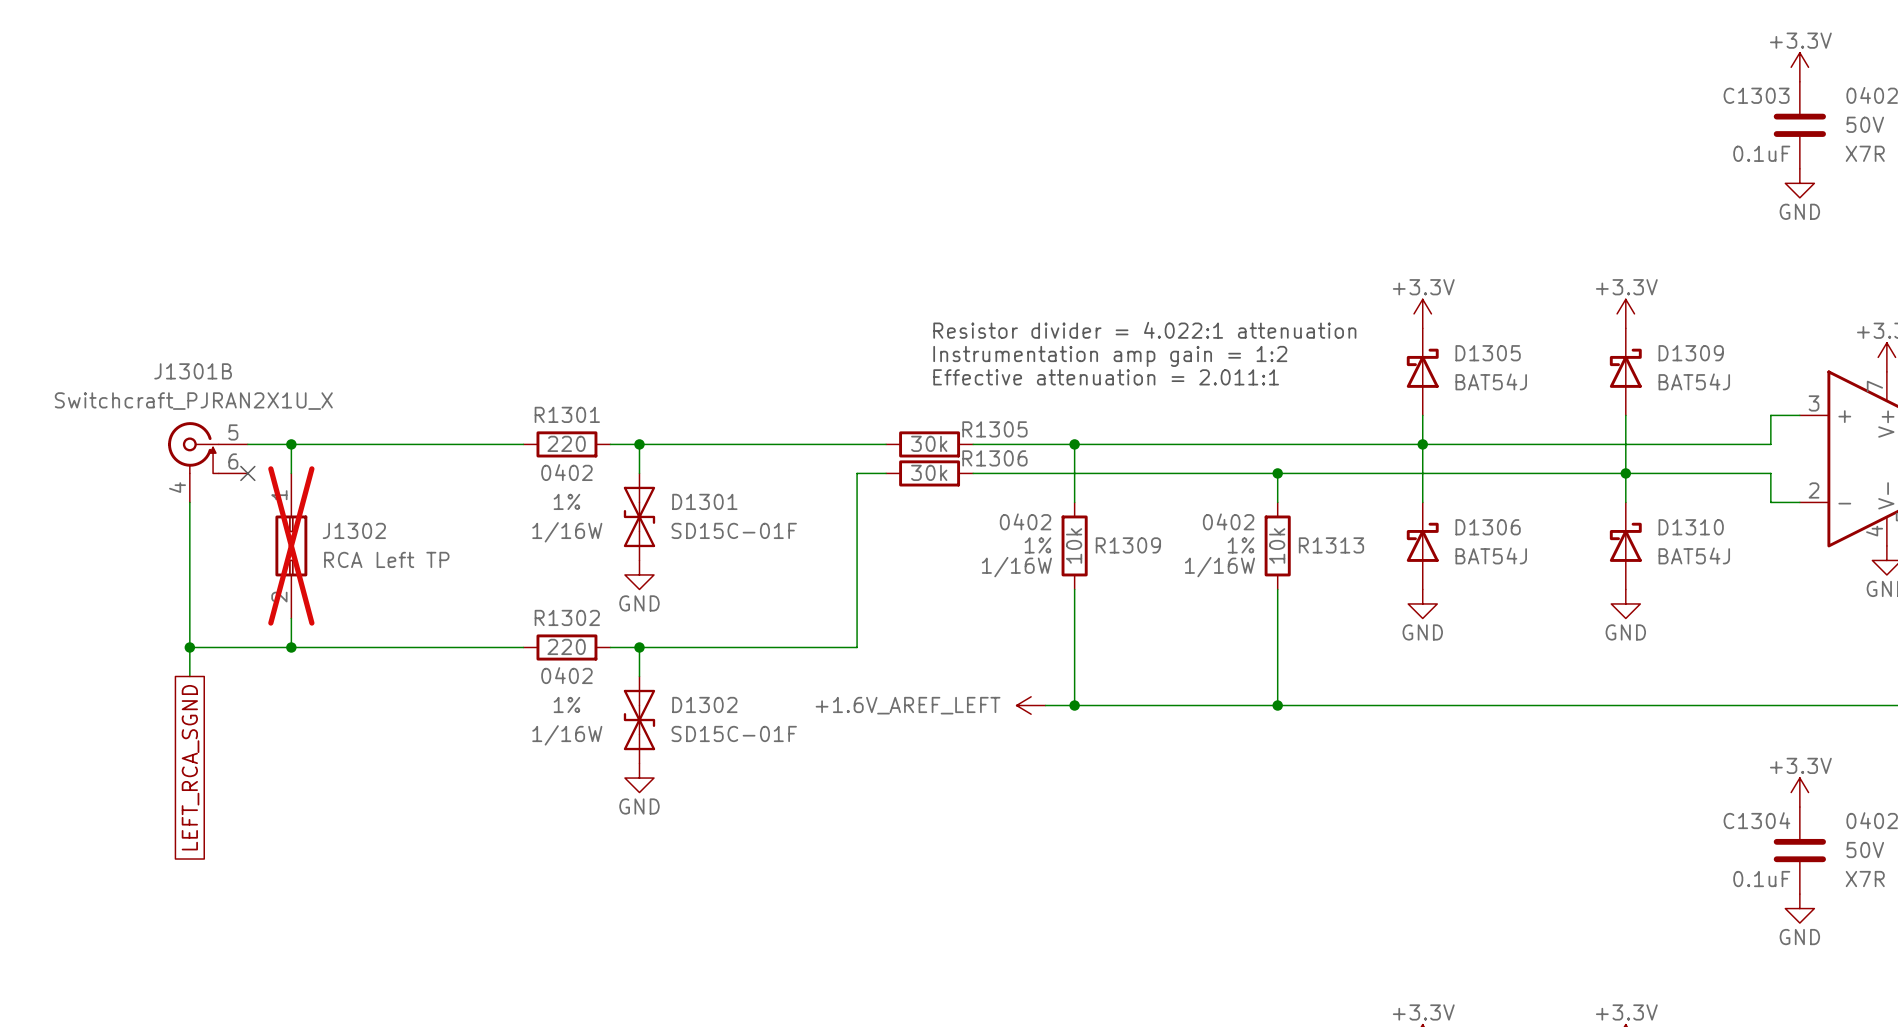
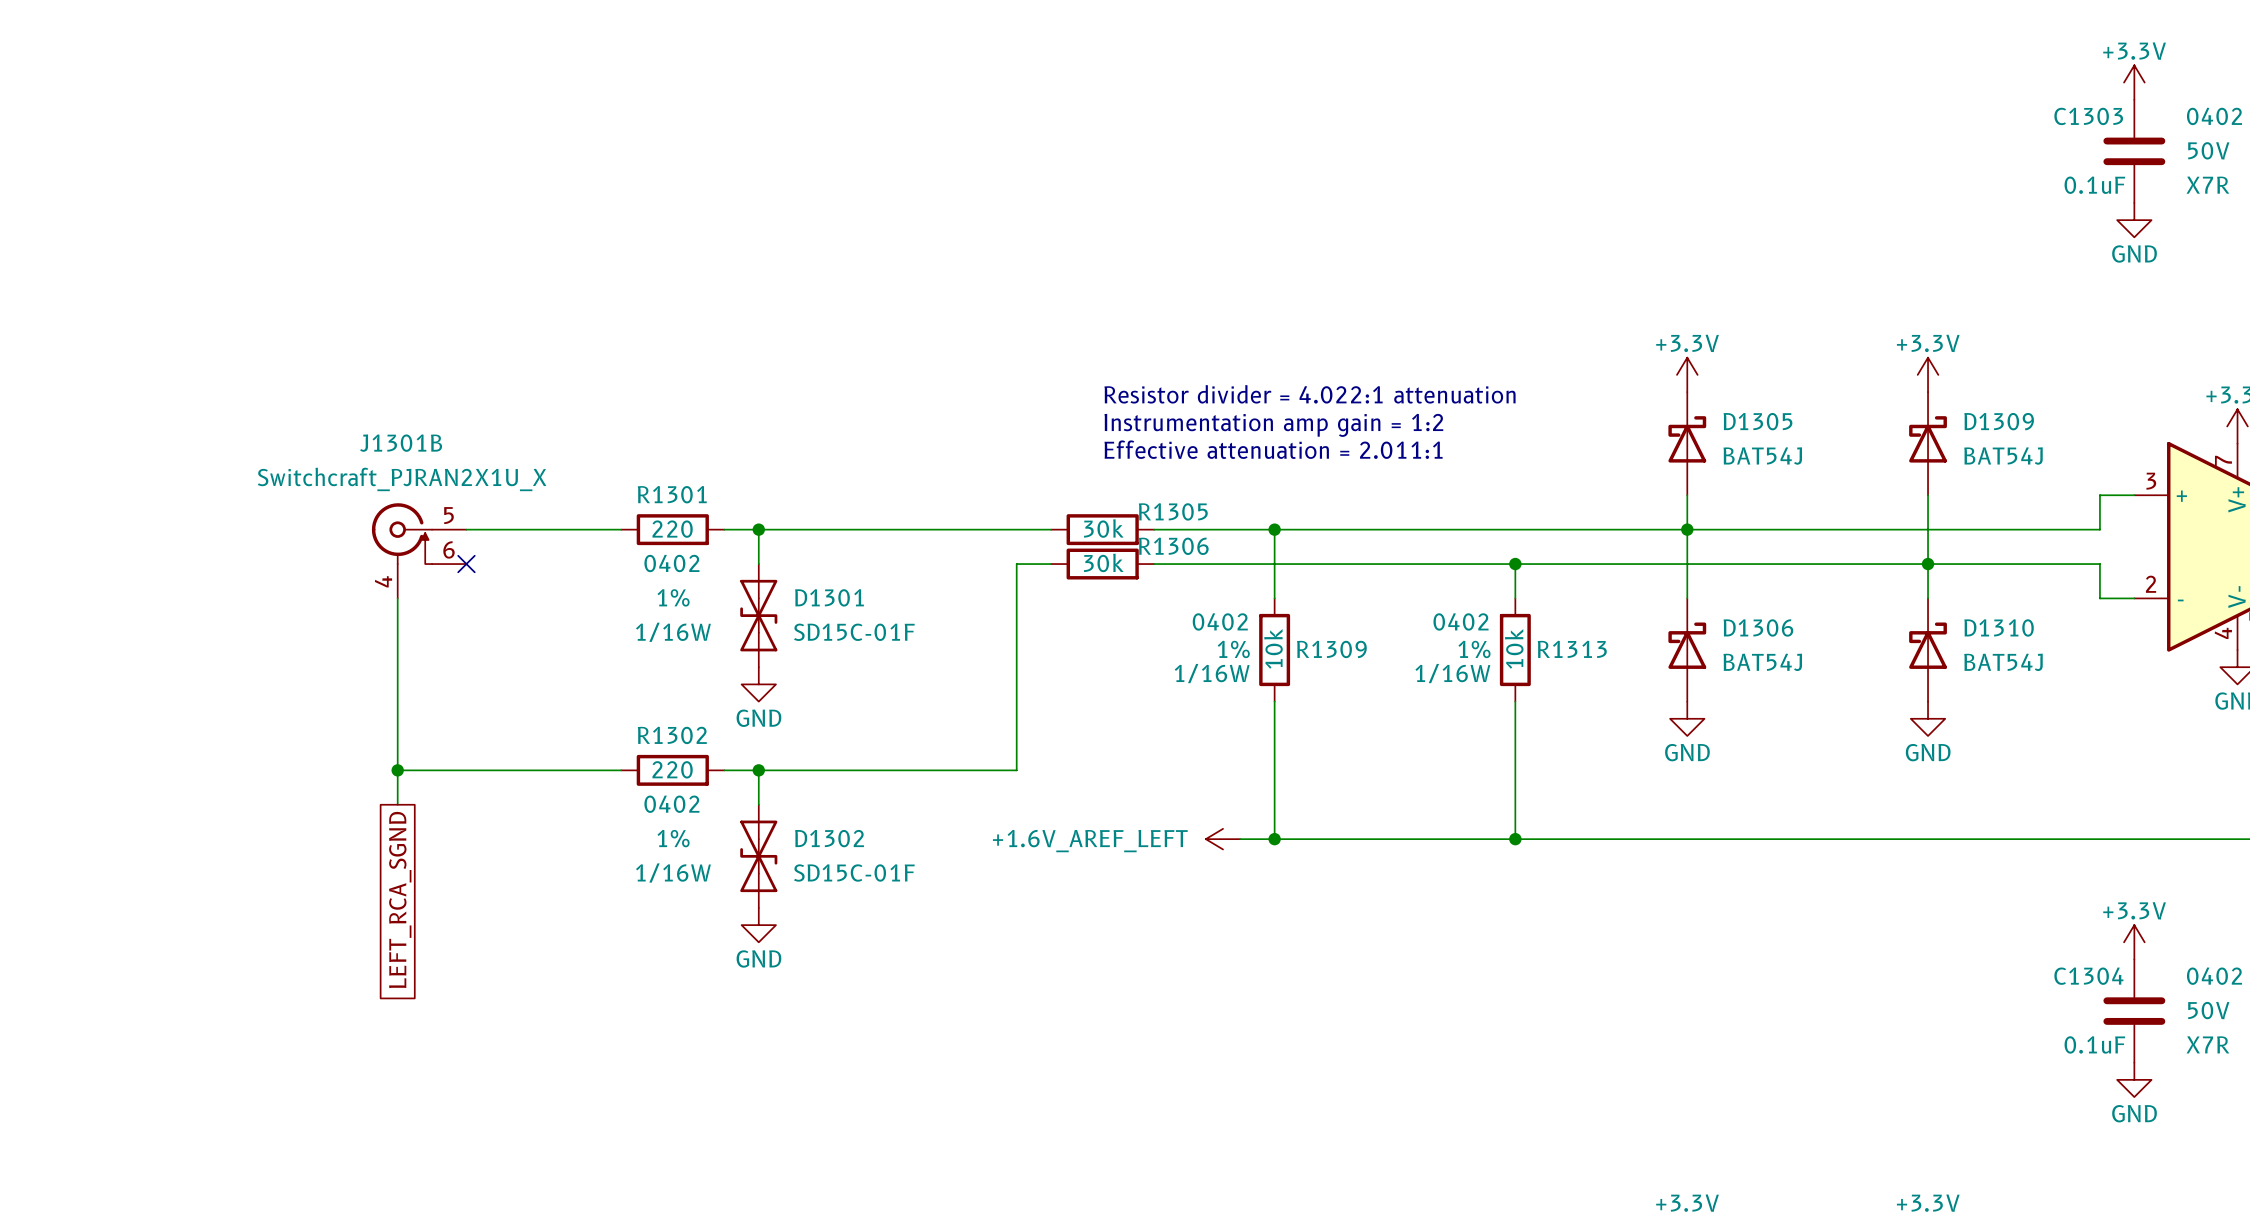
wire: (247, 444) (392, 444) -> none
wire: (291, 444) (291, 473) -> none
junction: (291, 444) -> none
J1301B position: (207, 462) -> (419, 550)
no-connect mark: (247, 473) -> none
no-connect mark: none -> (466, 564)
wire: (189, 502) (189, 676) -> (397, 598) (397, 804)
J1302: RCA Left TP (291, 545) -> none
wire: (291, 618) (291, 647) -> none
wire: (189, 647) (334, 647) -> none
junction: (189, 647) -> none
junction position: (291, 647) -> (397, 770)
global label position: LEFT_RCA_SGND (190, 767) -> LEFT_RCA_SGND (400, 900)

